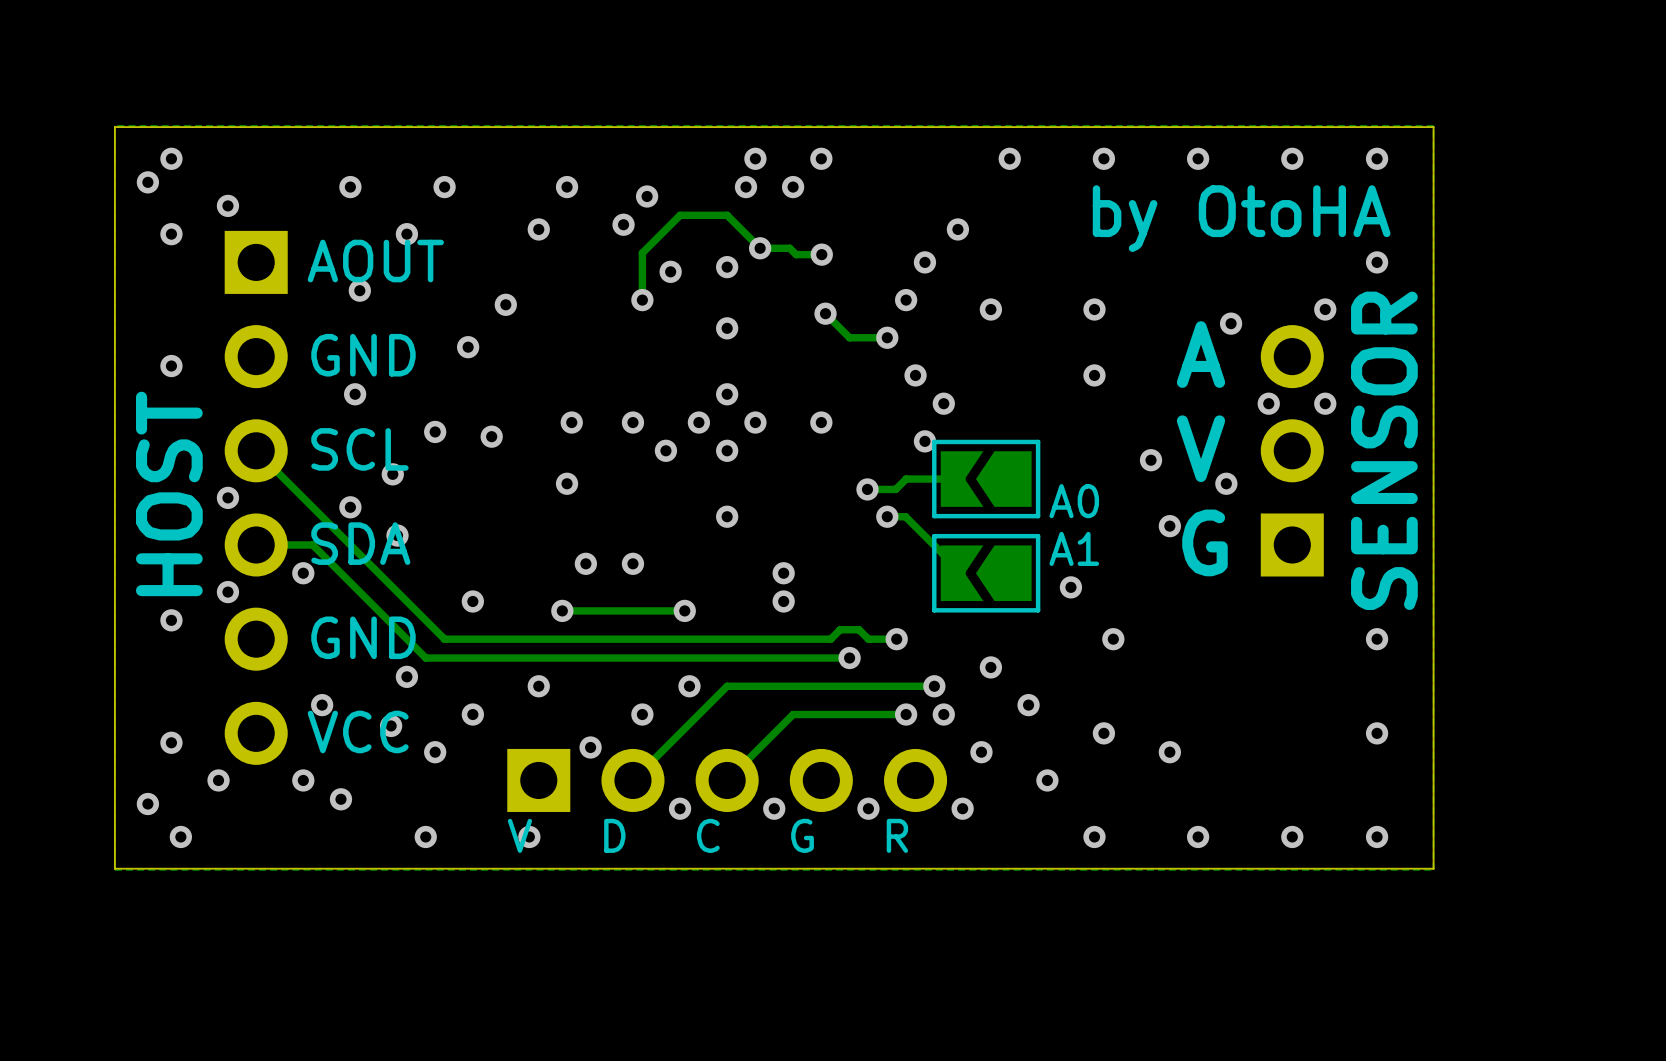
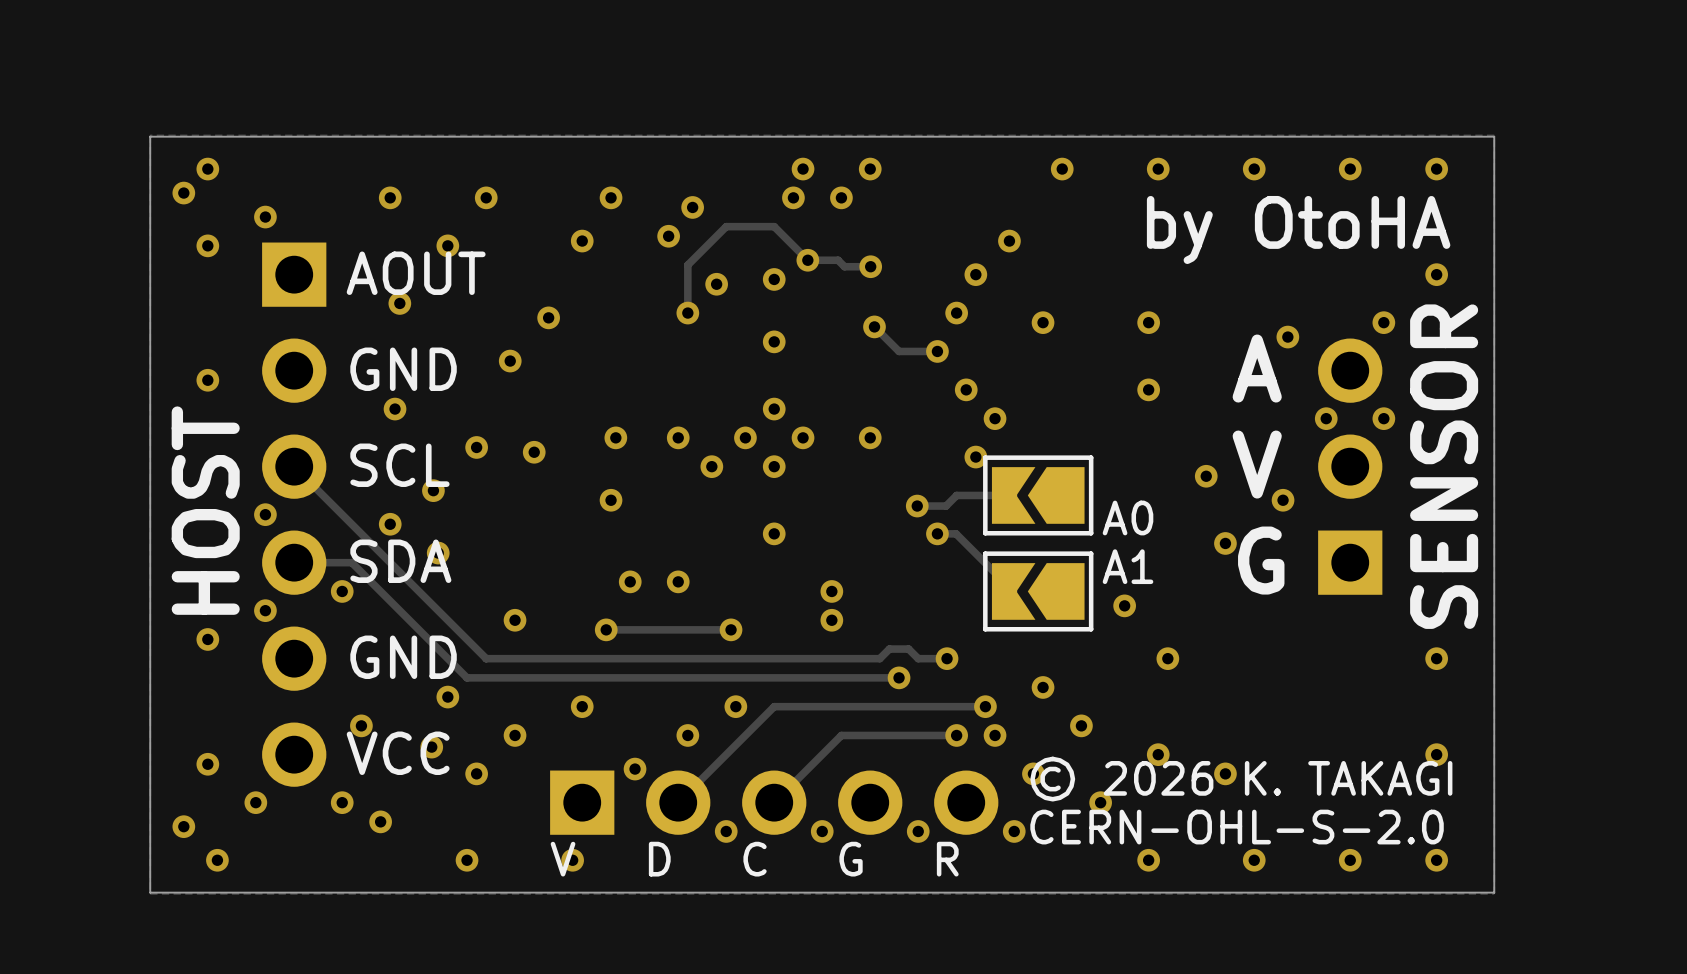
text: none -> © 2026 K. TAKAGI (1241, 779)
text: none -> CERN-OHL-S-2.0 (1237, 827)

